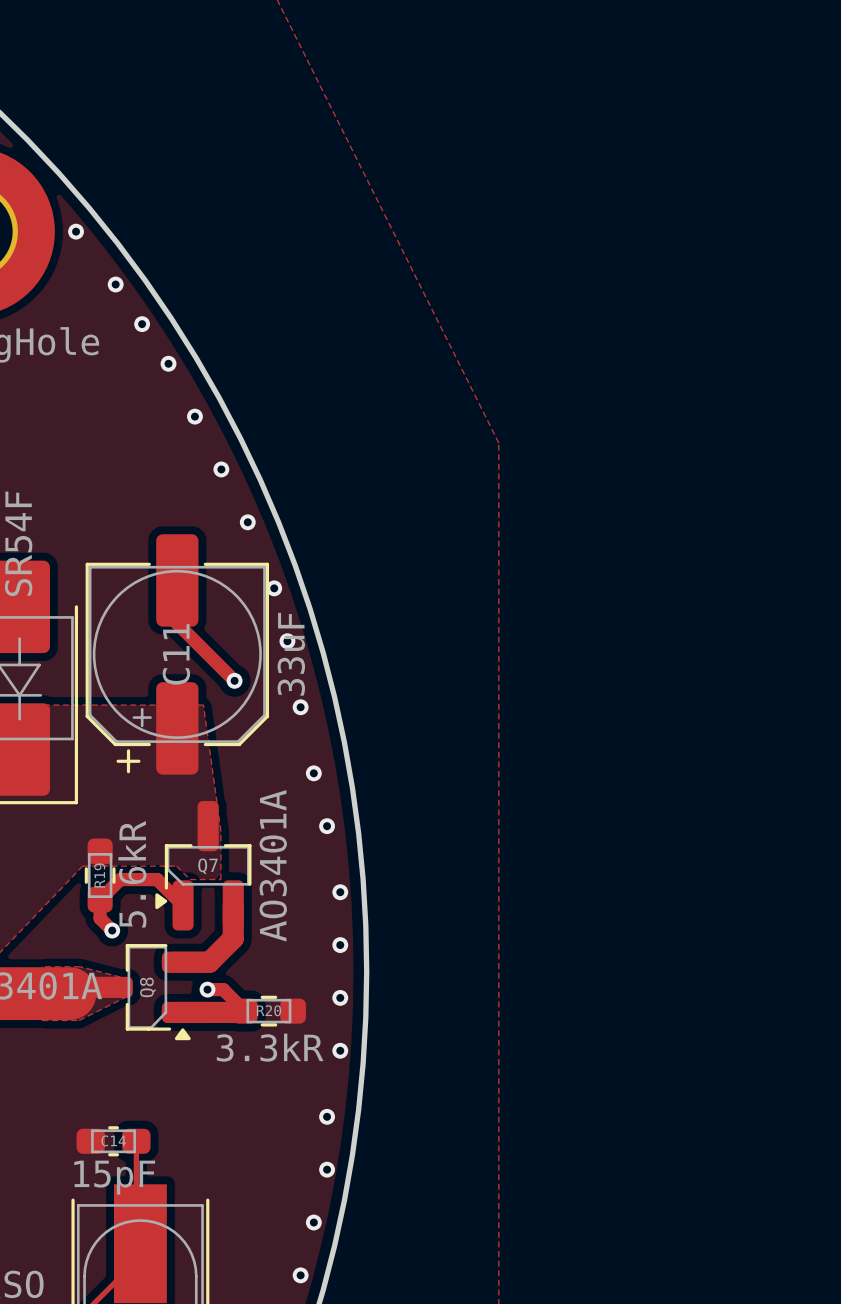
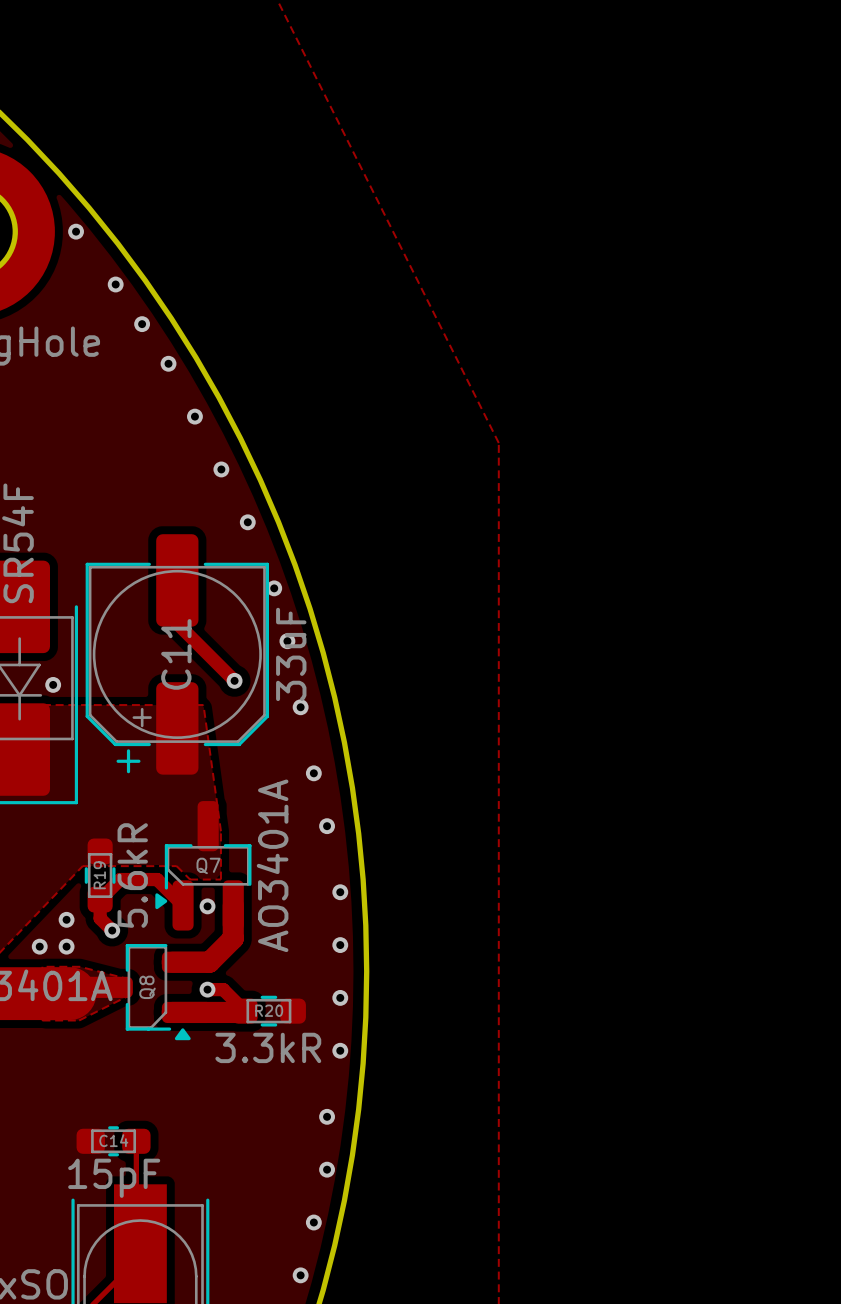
via: none -> (53, 684)
via: none -> (207, 906)
via: none -> (66, 919)
via: none -> (39, 946)
via: none -> (66, 946)

